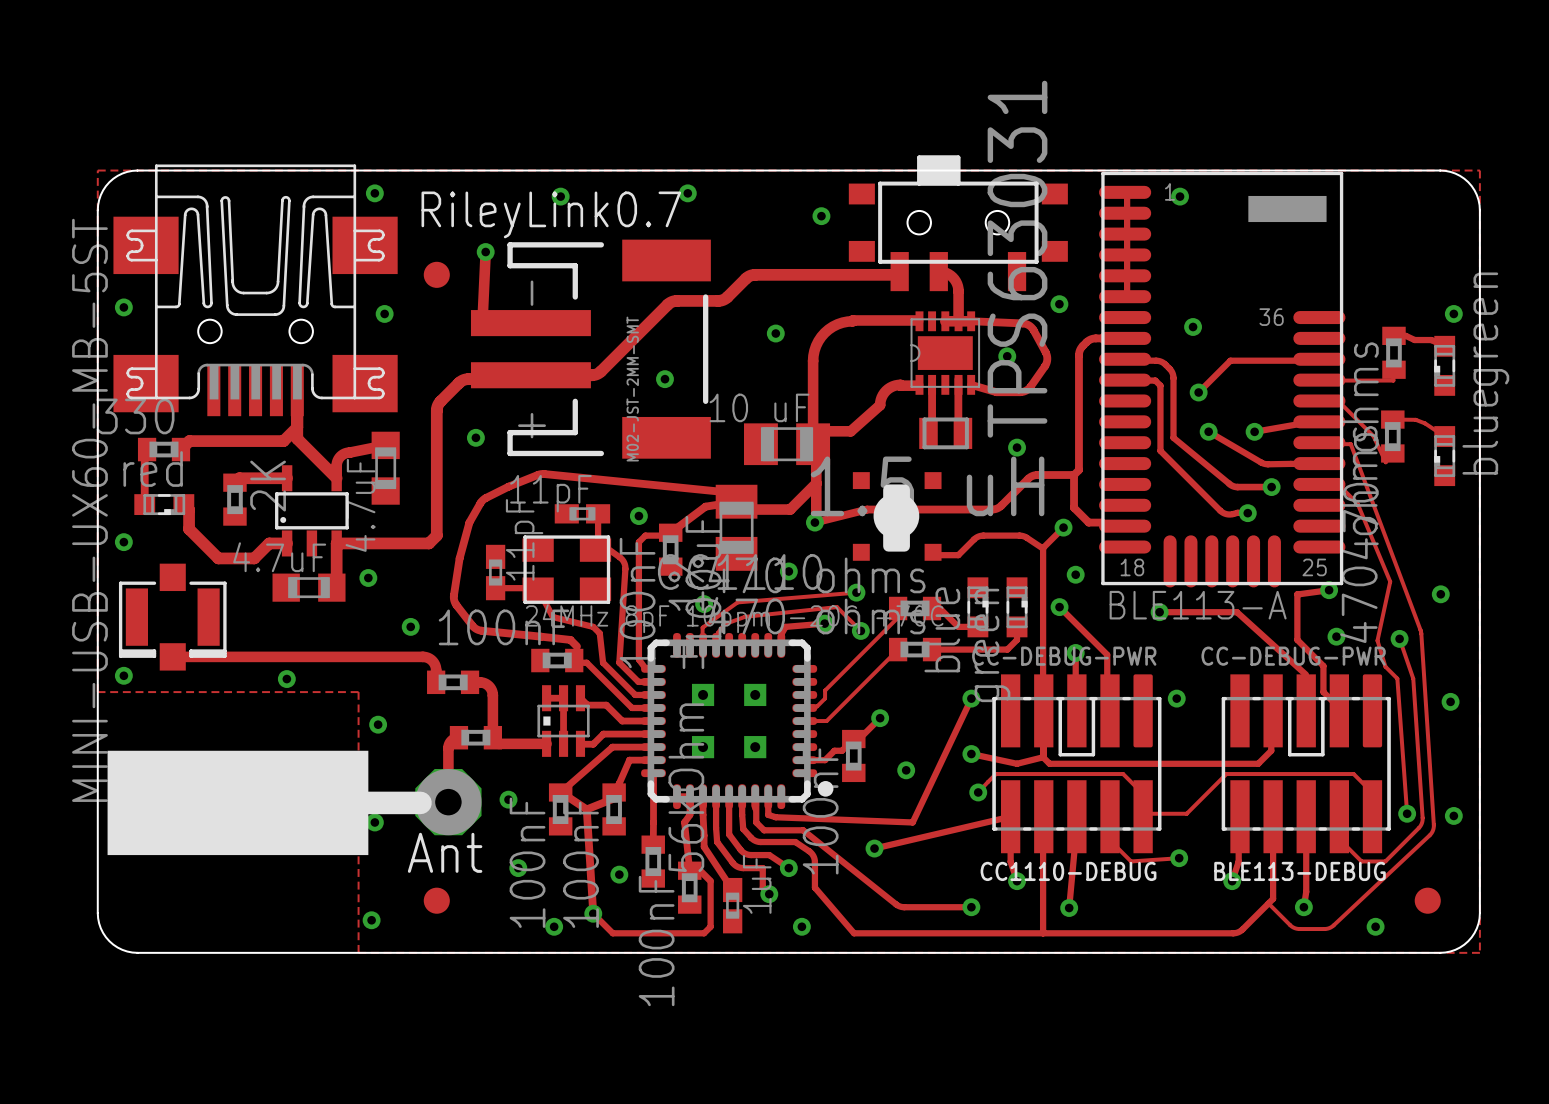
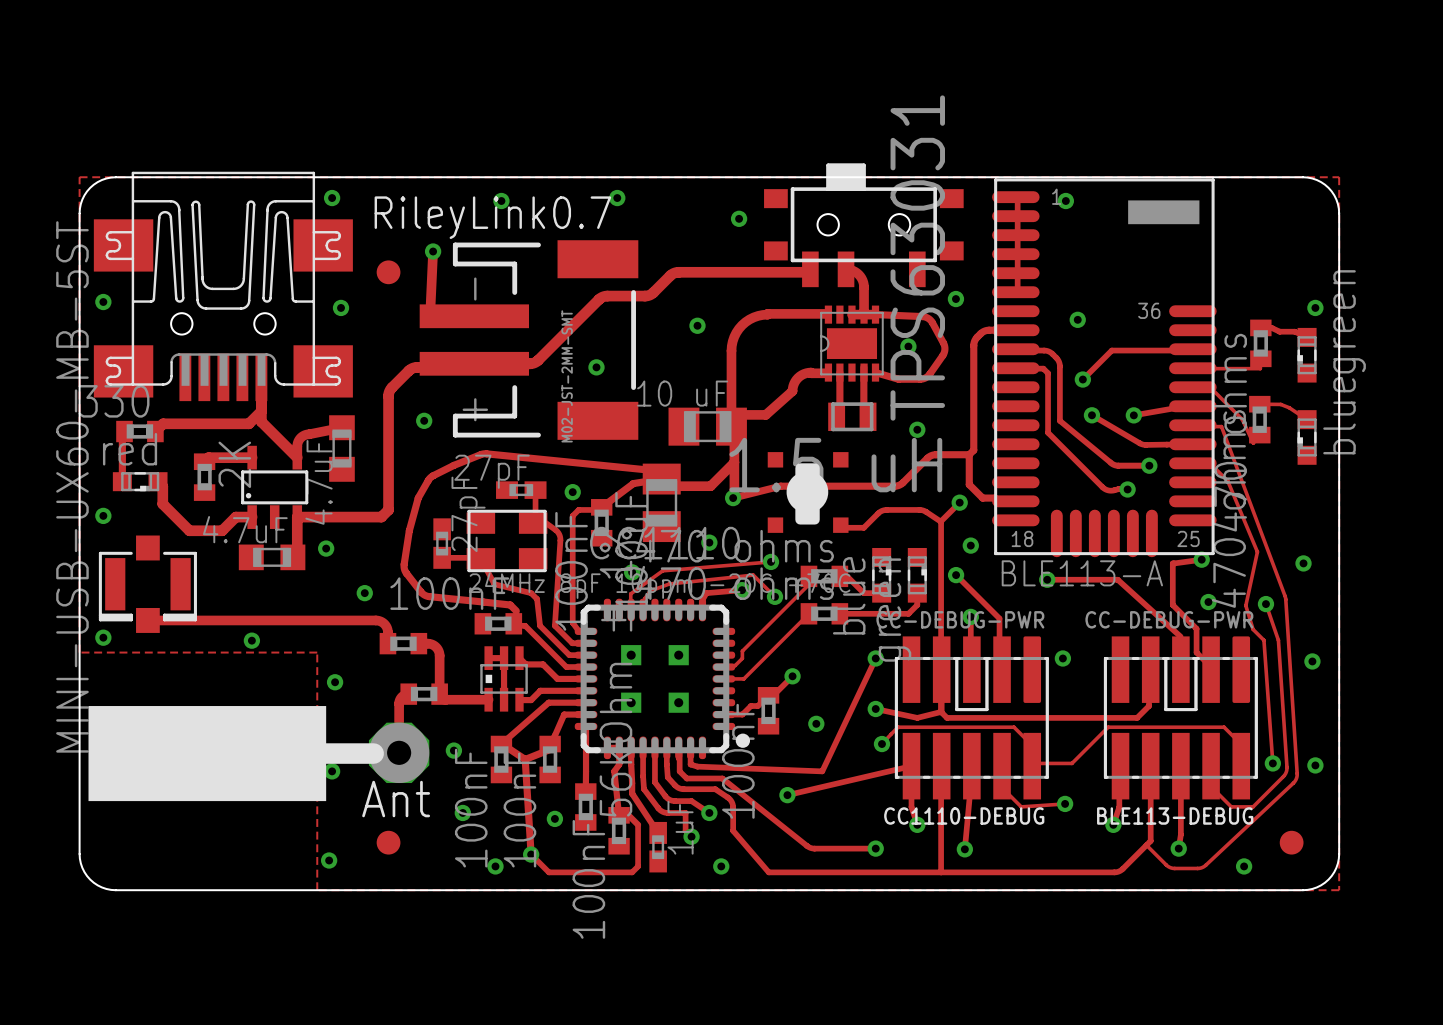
part value: 11pF (550, 493) -> 27pF (492, 471)
part value: 11pF (524, 539) -> 27pF (468, 514)

